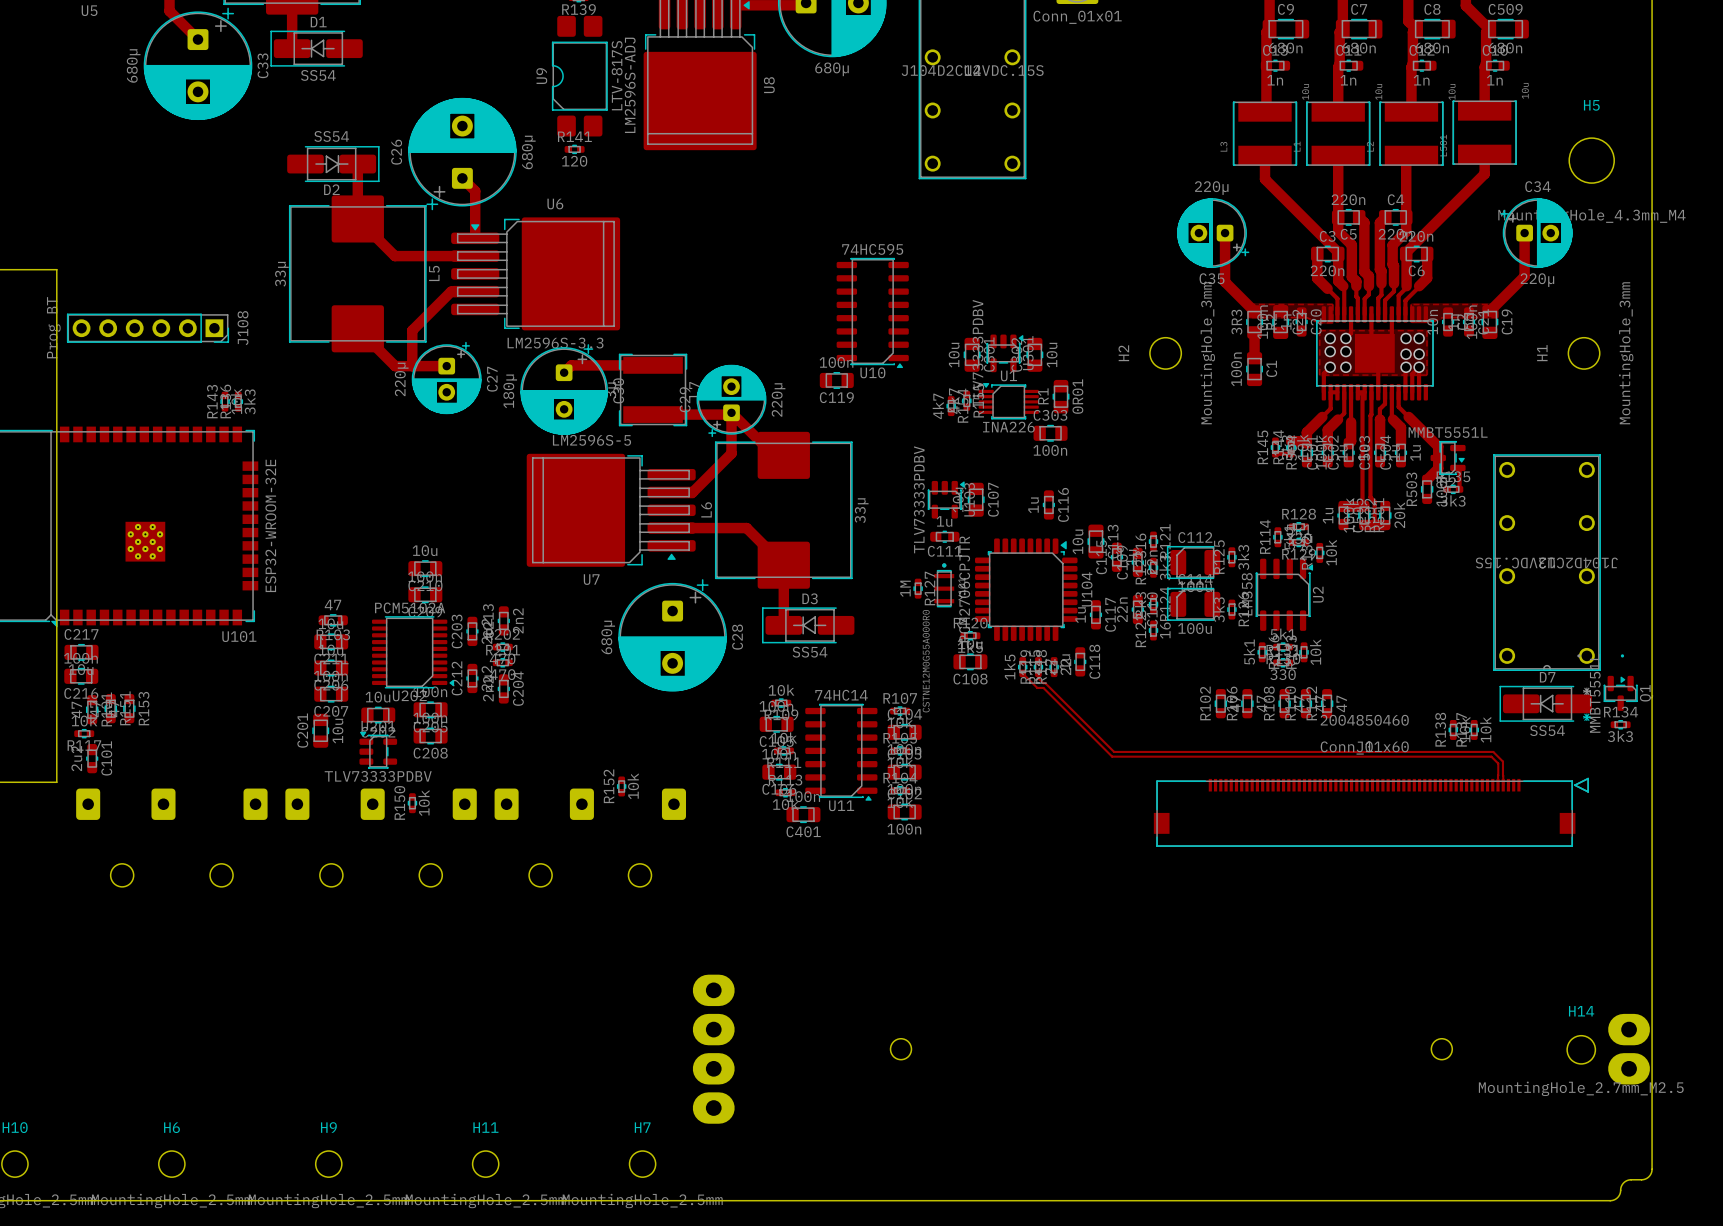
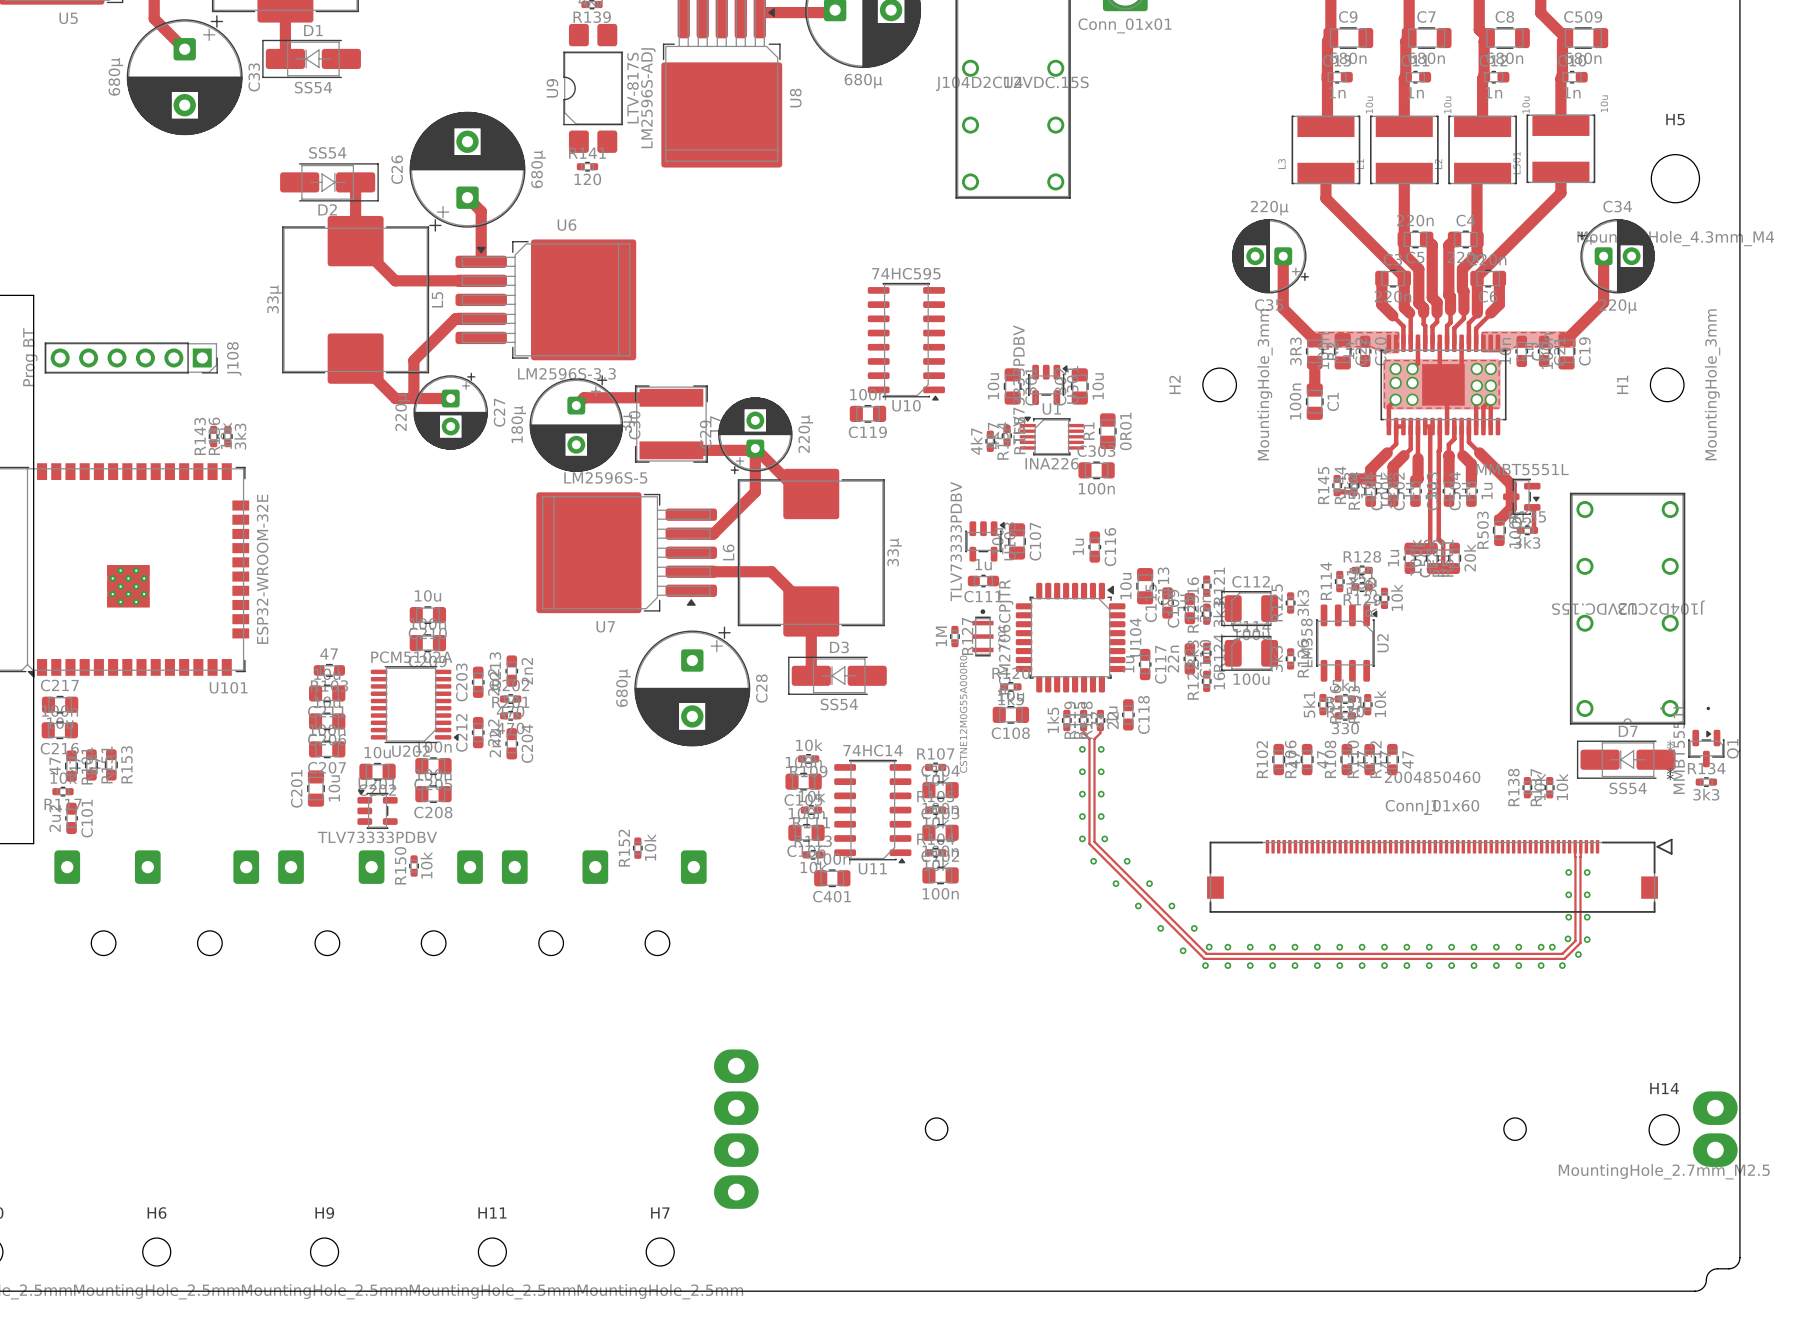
top track: (1022, 673) (1037, 687) (1043, 687) (1112, 756) (1491, 756) (1498, 763) (1498, 785) -> (1100, 727) (1100, 733) (1094, 739) (1094, 841) (1206, 953) (1562, 953) (1575, 940) (1575, 846)
top track: (1038, 678) (1114, 751) (1493, 751) (1502, 761) (1503, 785) -> (1083, 732) (1089, 739) (1089, 843) (1204, 958) (1564, 958) (1580, 942) (1580, 846)
via: none -> (1082, 749)
via: none -> (1101, 749)
via: none -> (1082, 771)
via: none -> (1101, 771)
via: none -> (1082, 794)
via: none -> (1101, 794)
via: none -> (1082, 816)
via: none -> (1101, 816)
via: none -> (1082, 838)
via: none -> (1104, 838)
via: none -> (1093, 861)
via: none -> (1127, 861)
via: none -> (1568, 872)
via: none -> (1587, 872)
via: none -> (1115, 883)
via: none -> (1149, 883)
via: none -> (1568, 894)
via: none -> (1587, 894)
via: none -> (1138, 906)
via: none -> (1171, 906)
via: none -> (1568, 917)
via: none -> (1587, 917)
via: none -> (1160, 928)
via: none -> (1194, 928)
via: none -> (1567, 938)
via: none -> (1587, 939)
via: none -> (1209, 947)
via: none -> (1227, 947)
via: none -> (1250, 947)
via: none -> (1272, 947)
via: none -> (1294, 947)
via: none -> (1317, 947)
via: none -> (1339, 947)
via: none -> (1362, 947)
via: none -> (1384, 947)
via: none -> (1406, 947)
via: none -> (1429, 947)
via: none -> (1451, 947)
via: none -> (1474, 947)
via: none -> (1496, 947)
via: none -> (1518, 947)
via: none -> (1541, 947)
via: none -> (1552, 947)
via: none -> (1183, 950)
via: none -> (1578, 954)
via: none -> (1205, 965)
via: none -> (1227, 965)
via: none -> (1250, 965)
via: none -> (1272, 965)
via: none -> (1294, 965)
via: none -> (1317, 965)
via: none -> (1339, 965)
via: none -> (1362, 965)
via: none -> (1384, 965)
via: none -> (1406, 965)
via: none -> (1429, 965)
via: none -> (1451, 965)
via: none -> (1474, 965)
via: none -> (1496, 965)
via: none -> (1518, 965)
via: none -> (1541, 965)
via: none -> (1562, 965)

